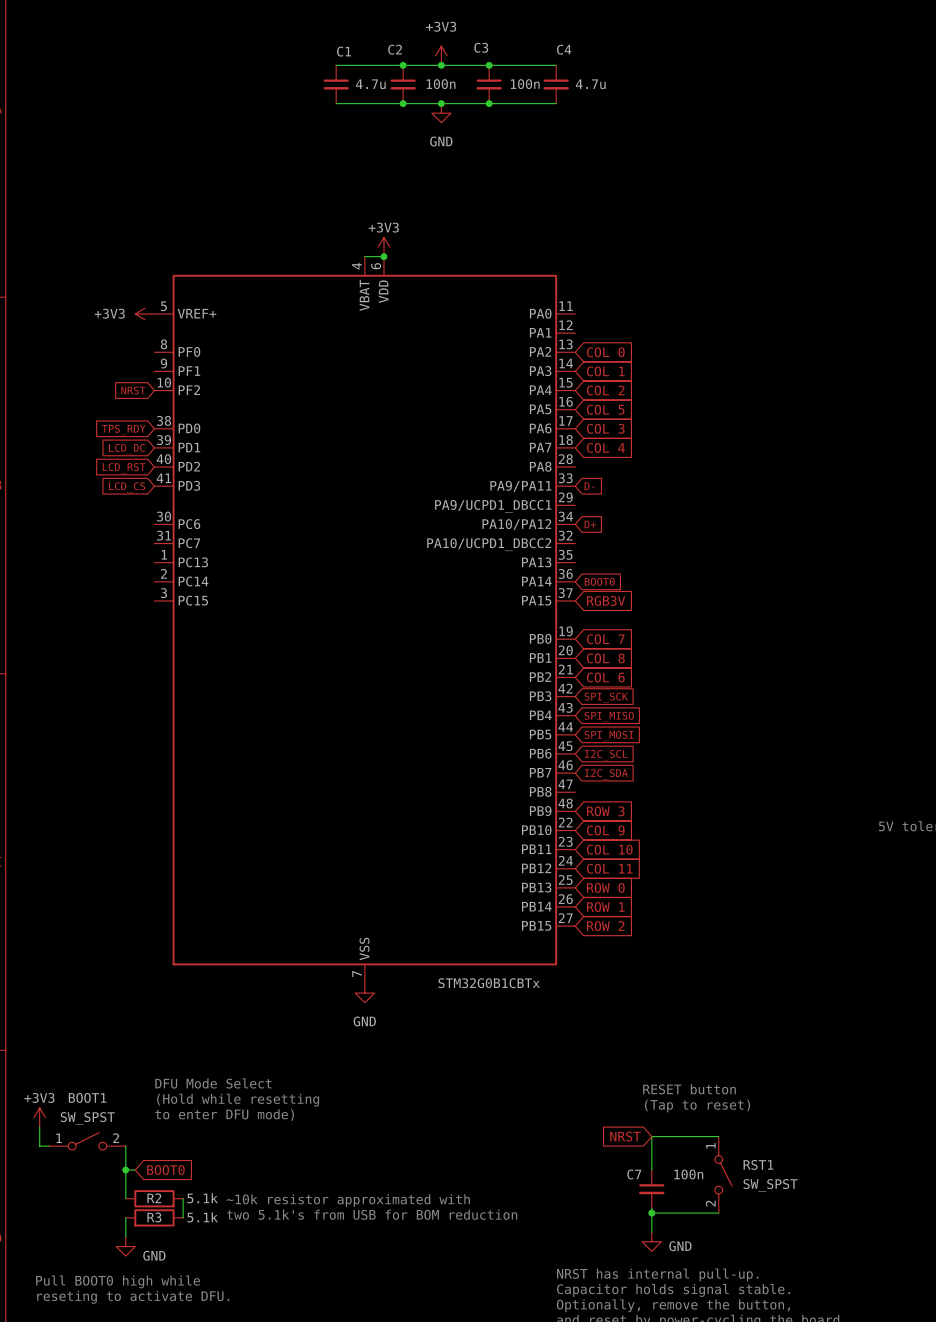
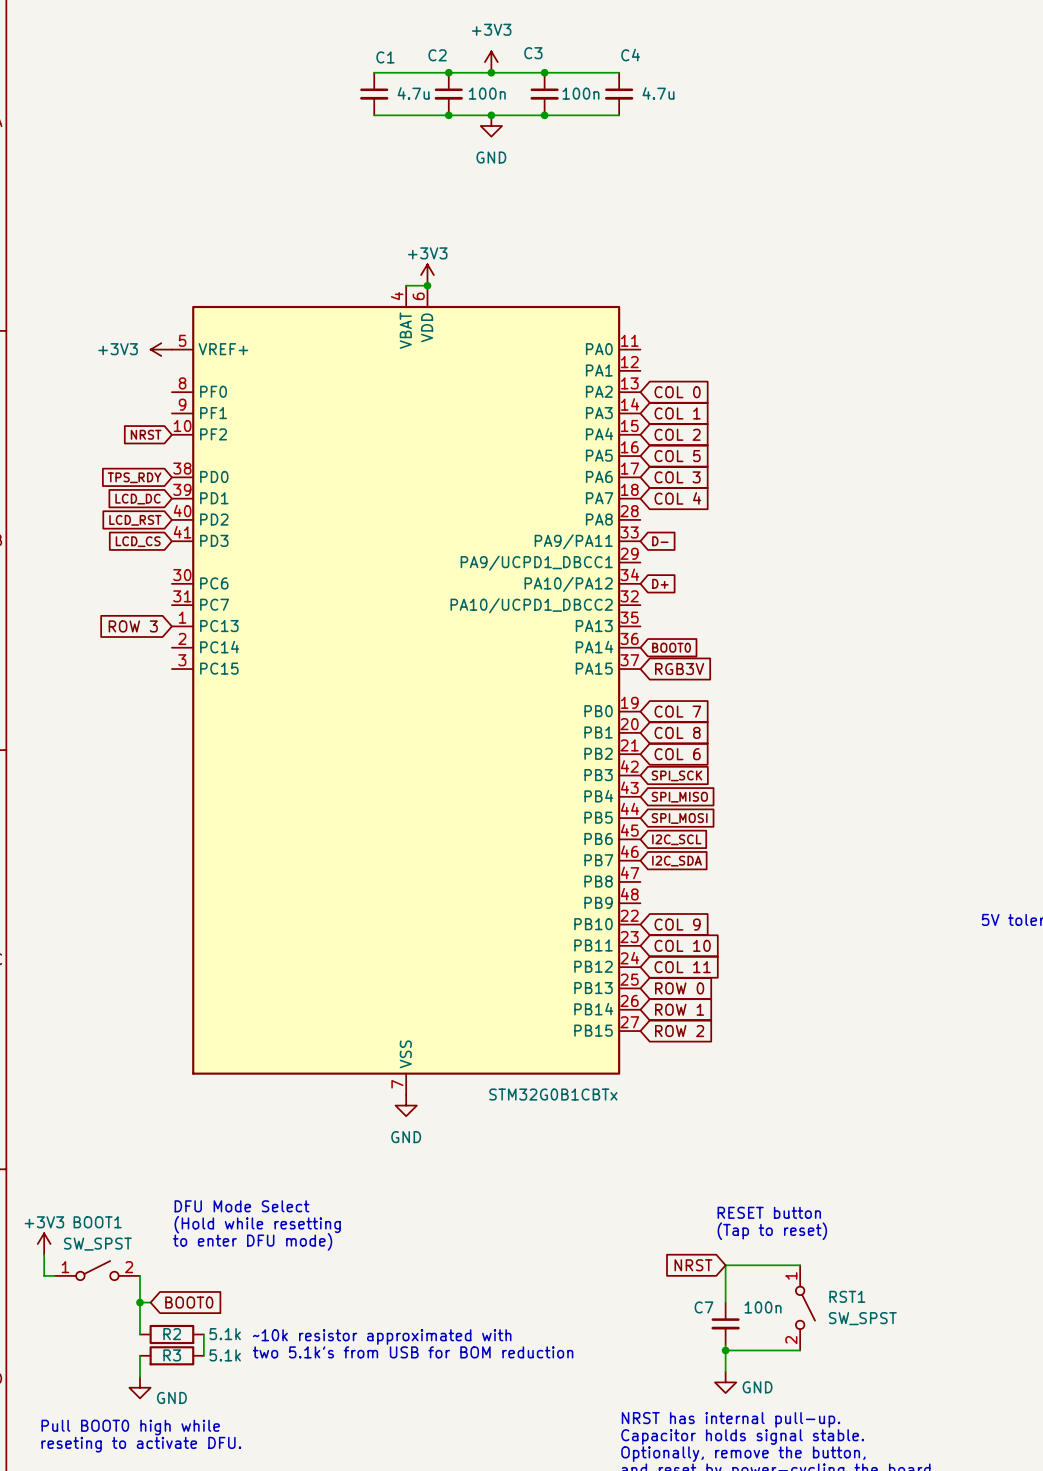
global label: none -> ROW 3 (133, 626)
global label: ROW 3 (605, 811) -> none

